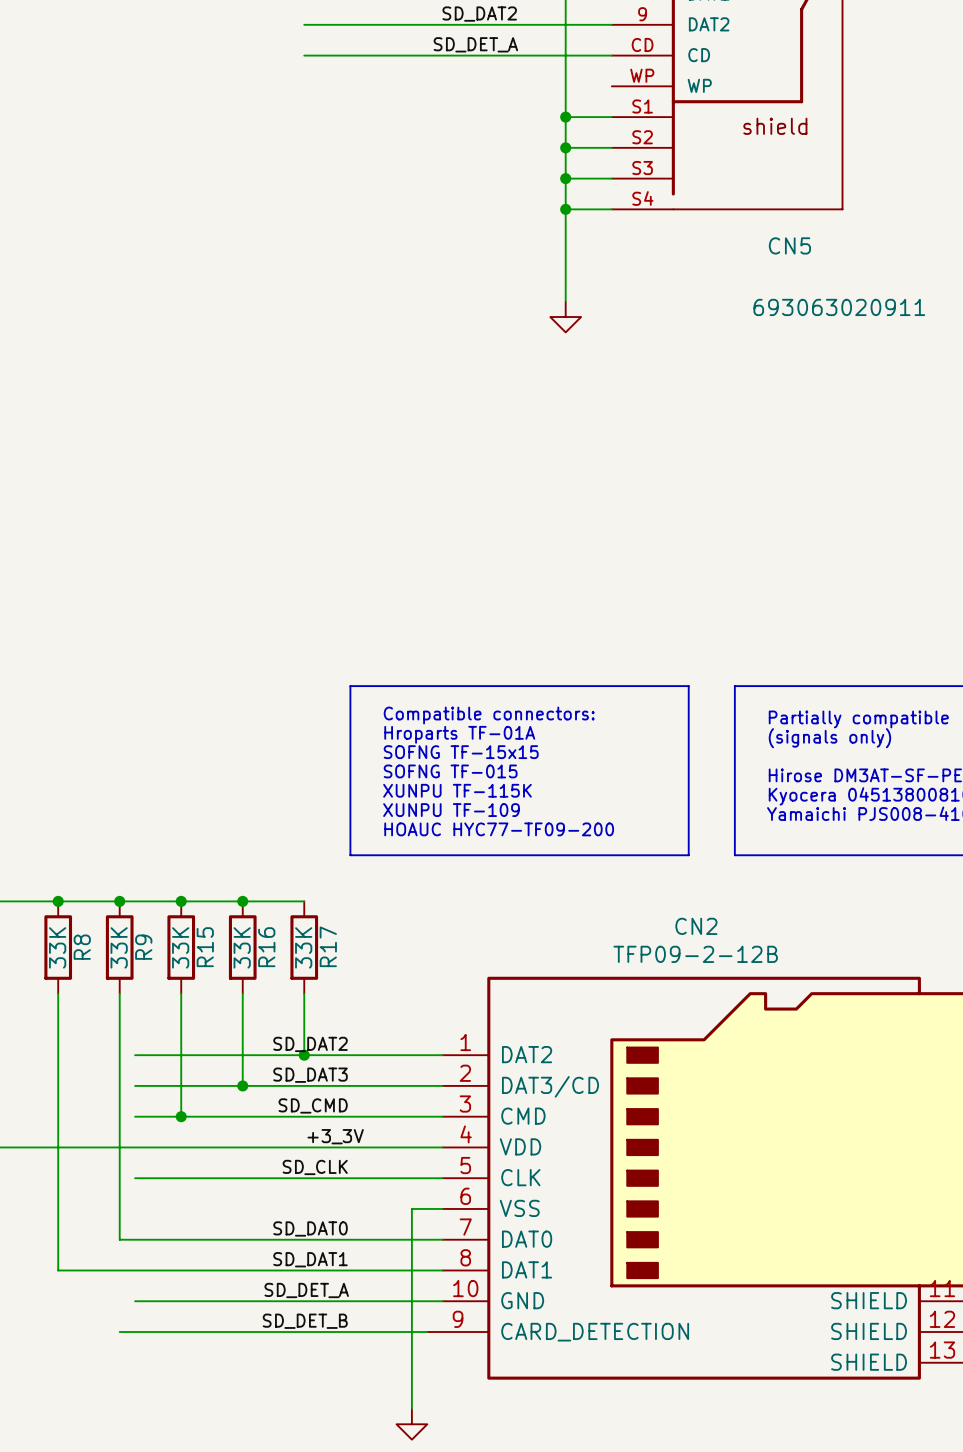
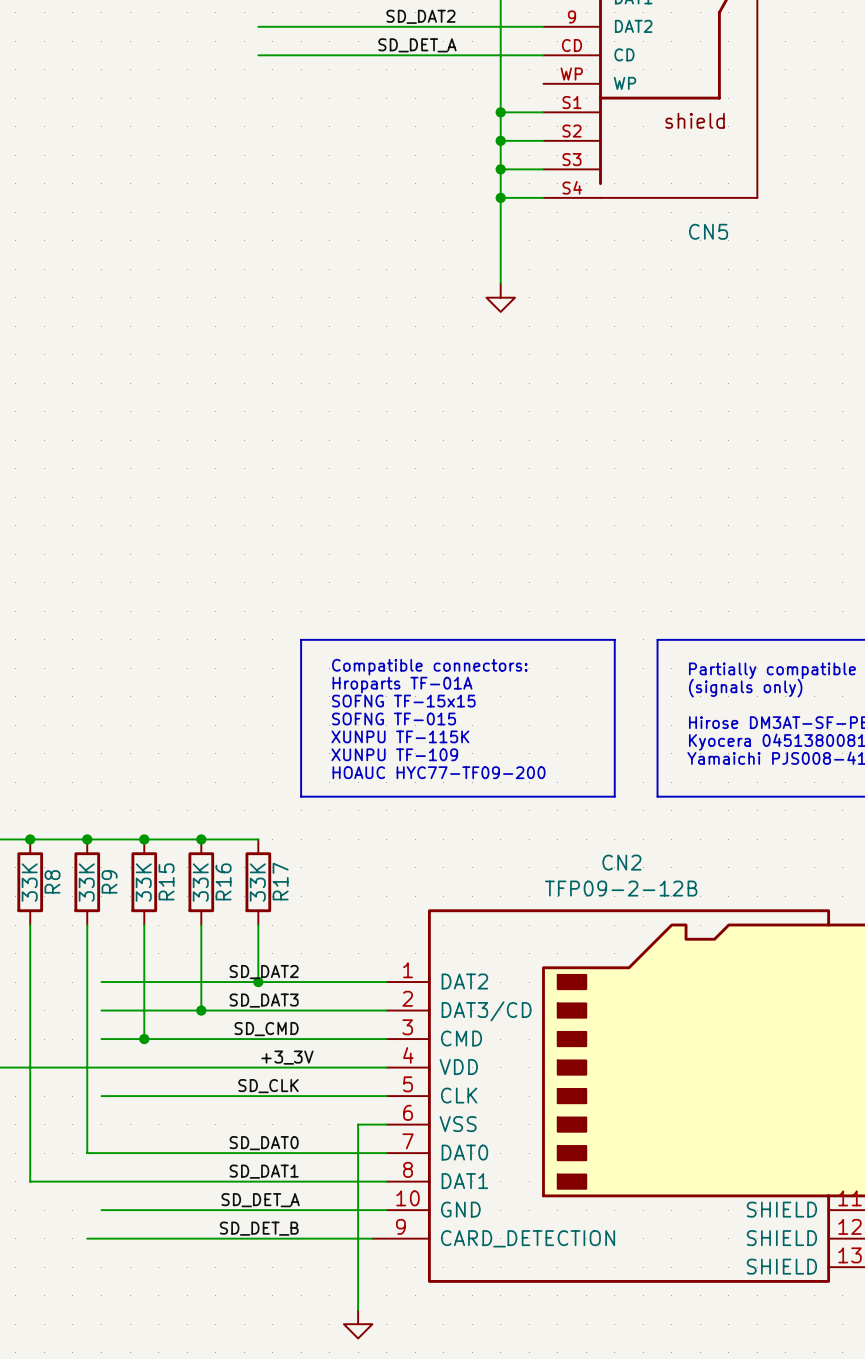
CN5 value: 693063020911 (839, 307) -> none

